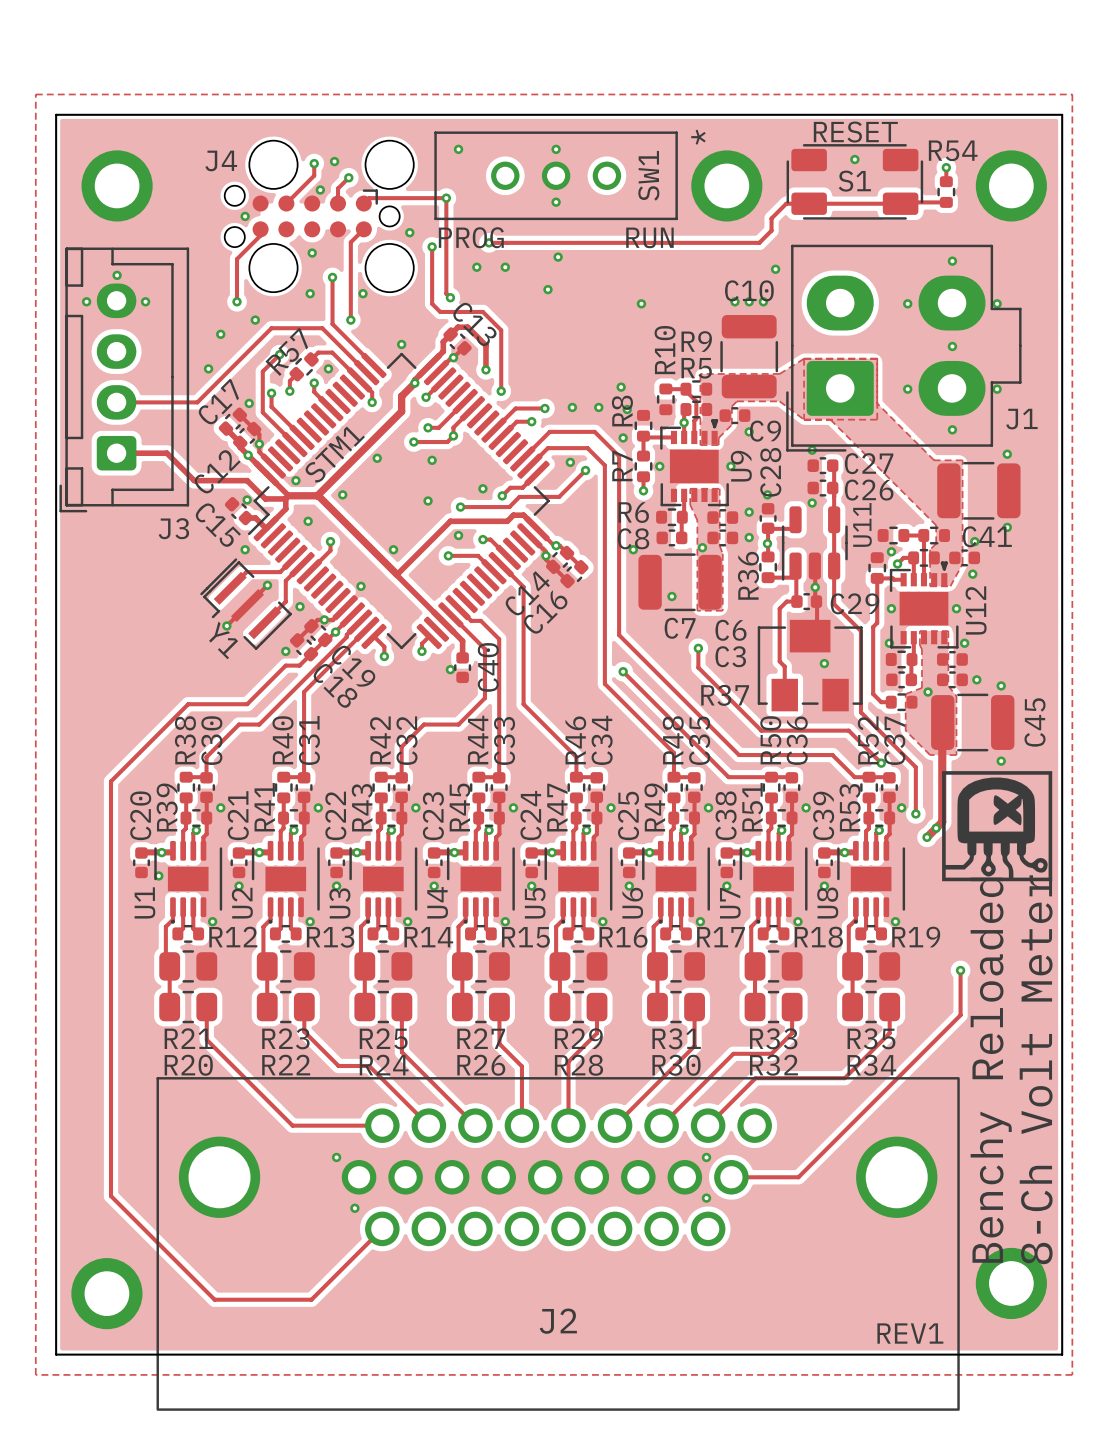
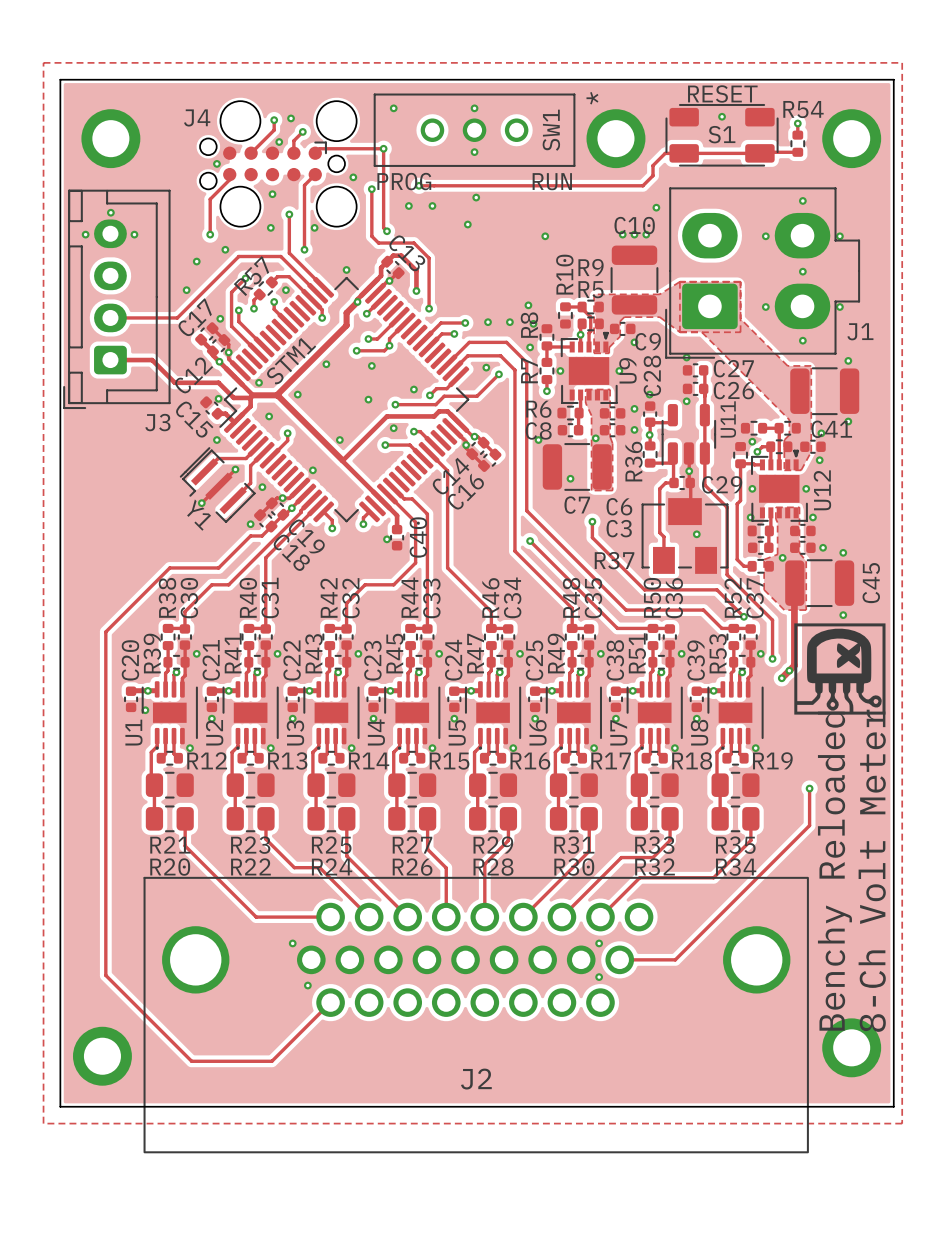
text: REV1 (910, 1333) -> none

